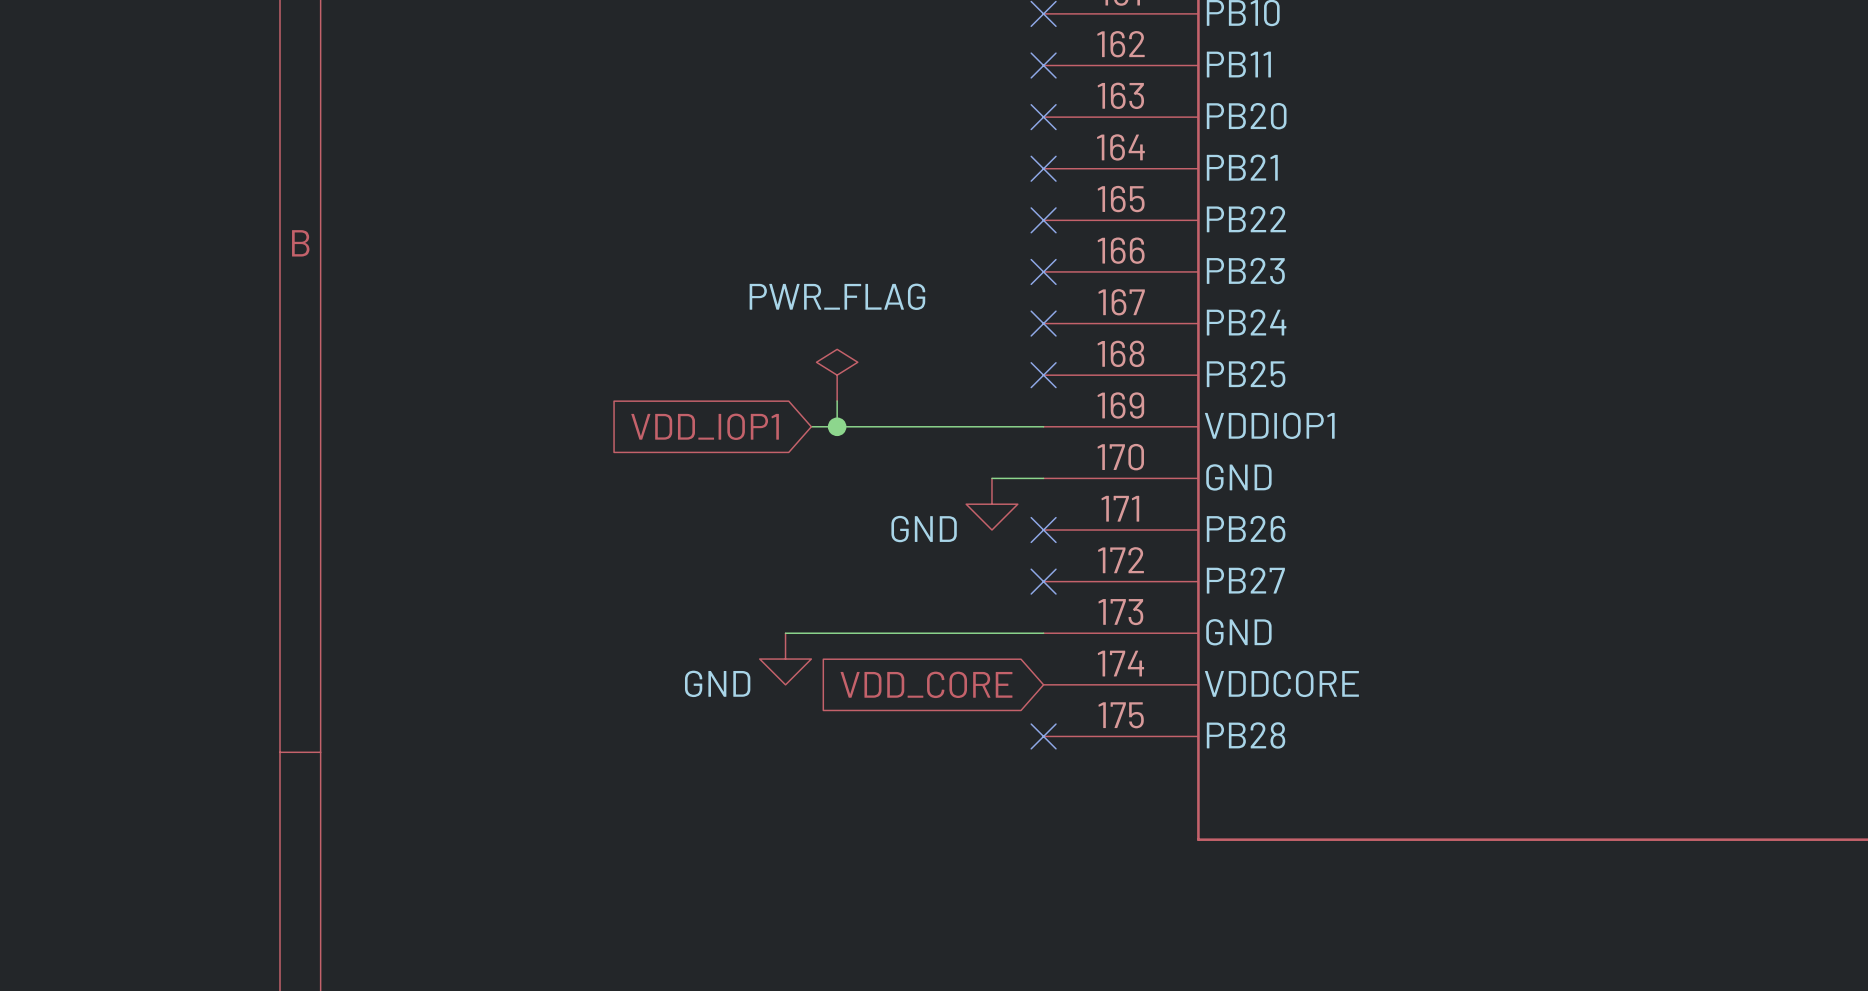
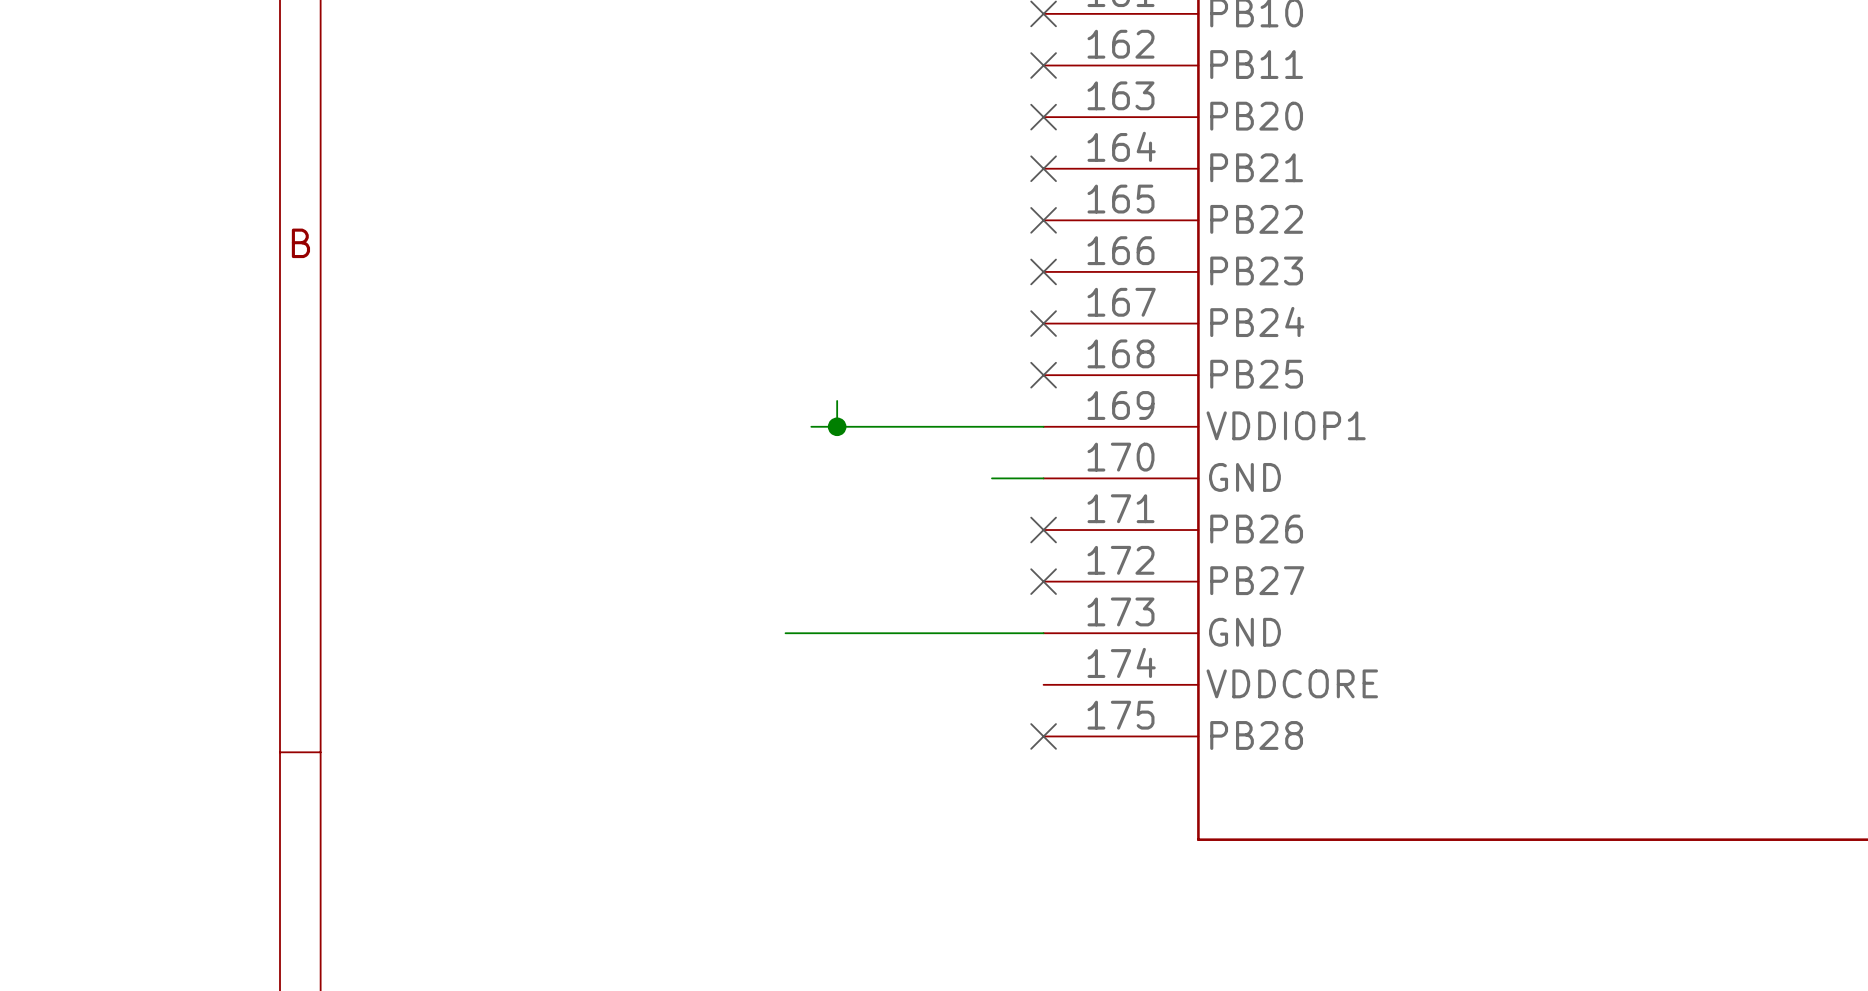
power symbol: PWR_FLAG (837, 375) -> none
global label: VDD_IOP1 (705, 426) -> none
power symbol: GND (991, 504) -> none
power symbol: GND (785, 659) -> none
global label: VDD_CORE (926, 684) -> none

